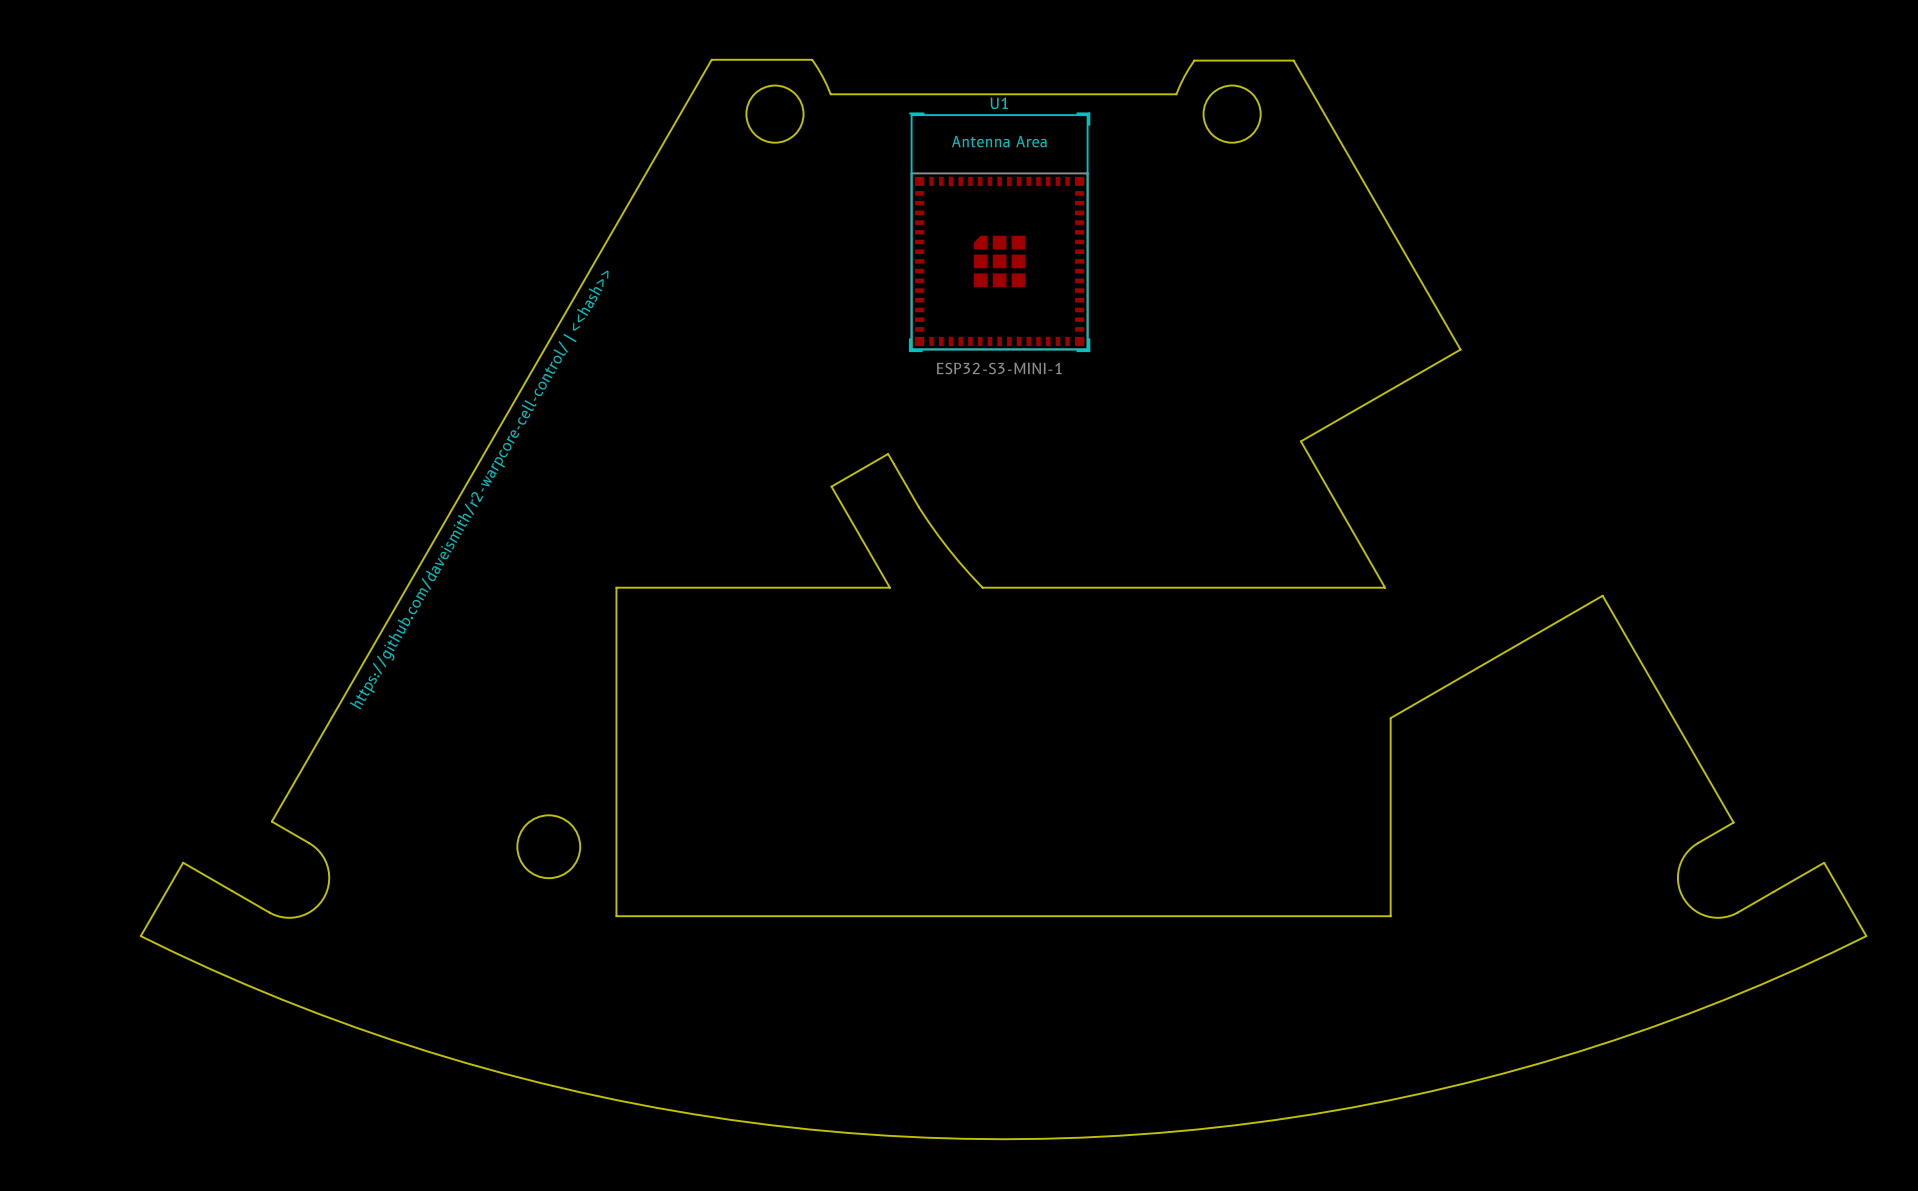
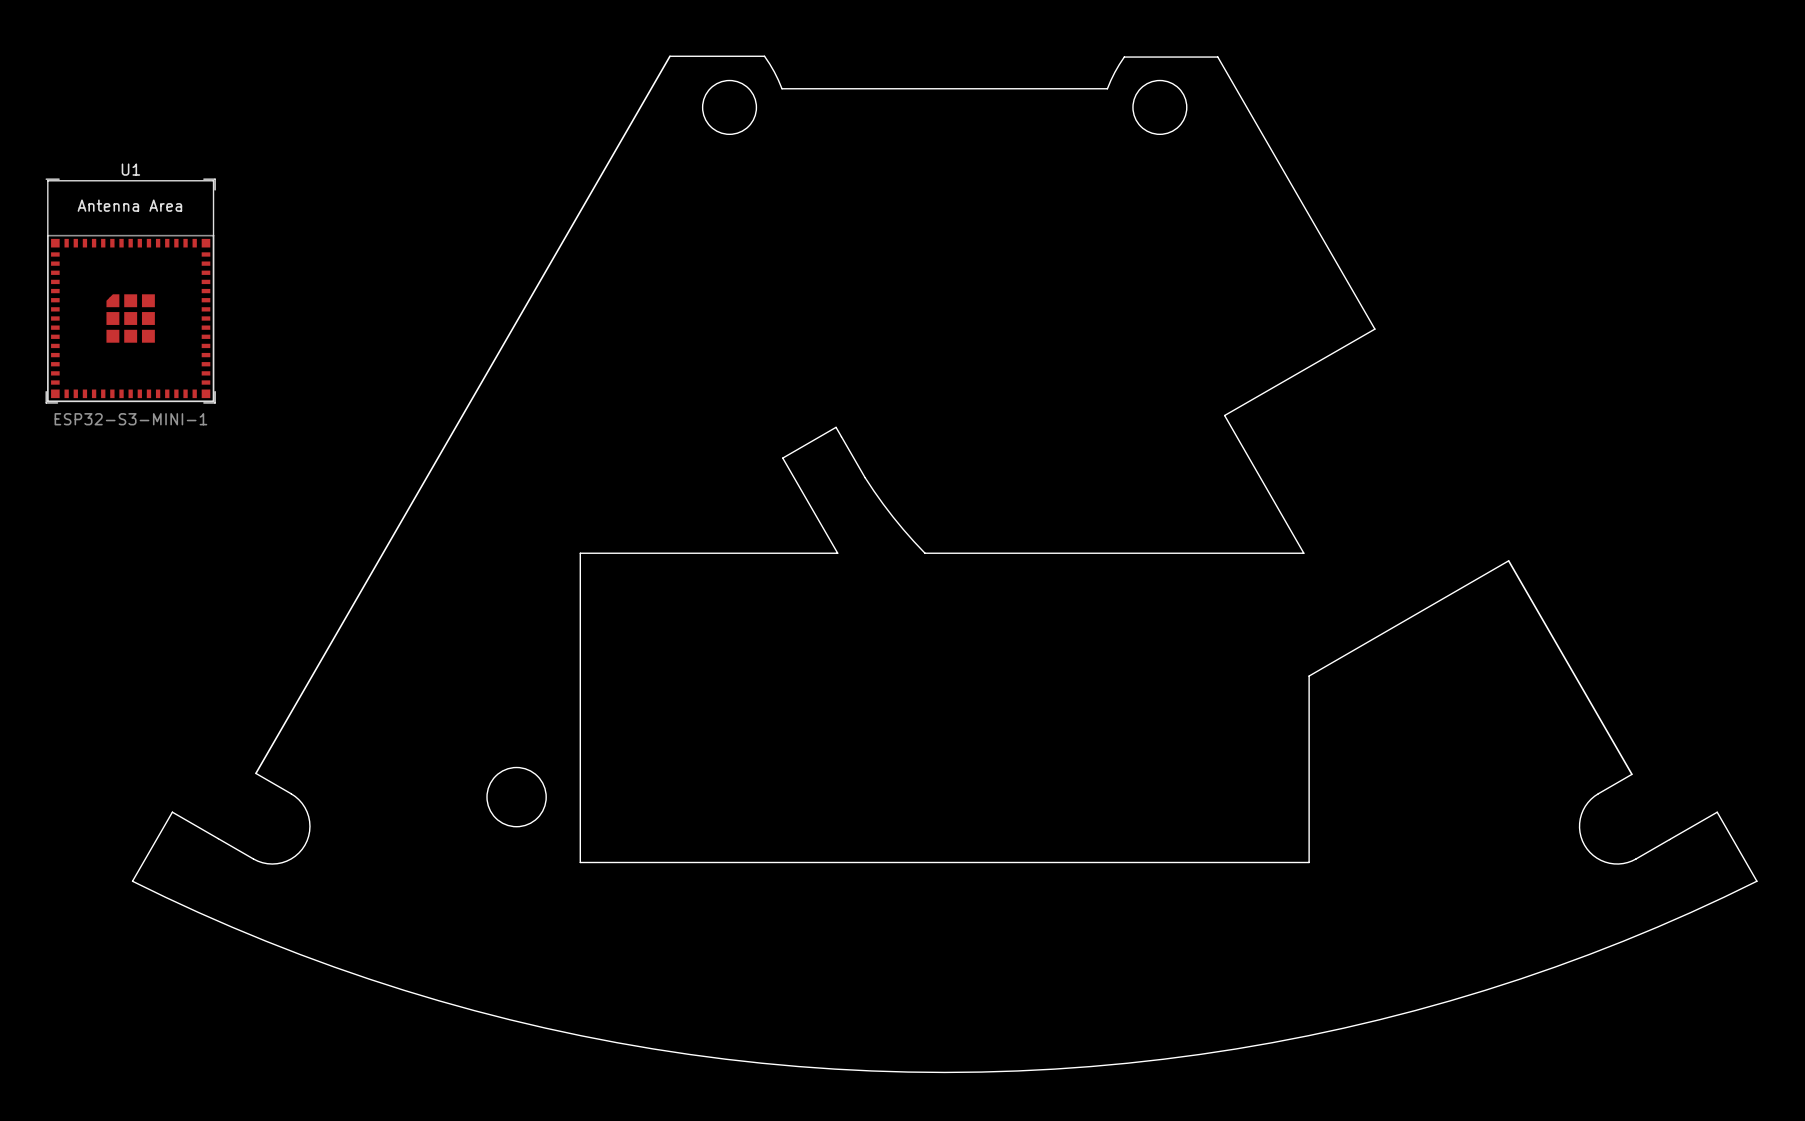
U1 position: (999, 232) -> (130, 291)
text: https://github.com/daveismith/r2-warpcore-cell-control/ | <<hash>> (479, 489) -> none

